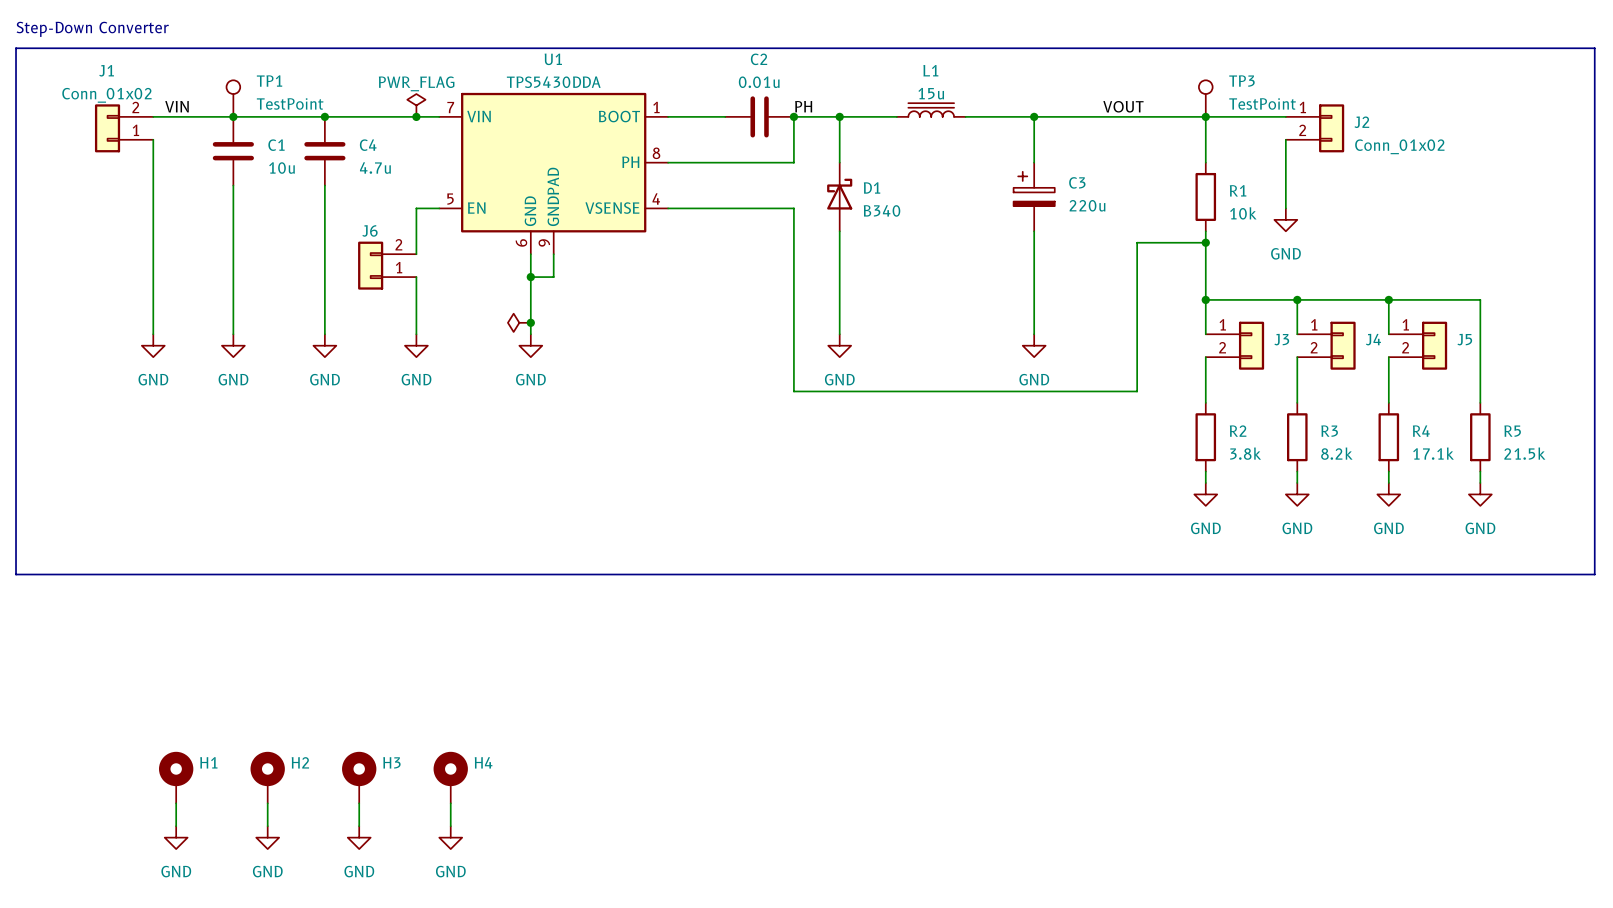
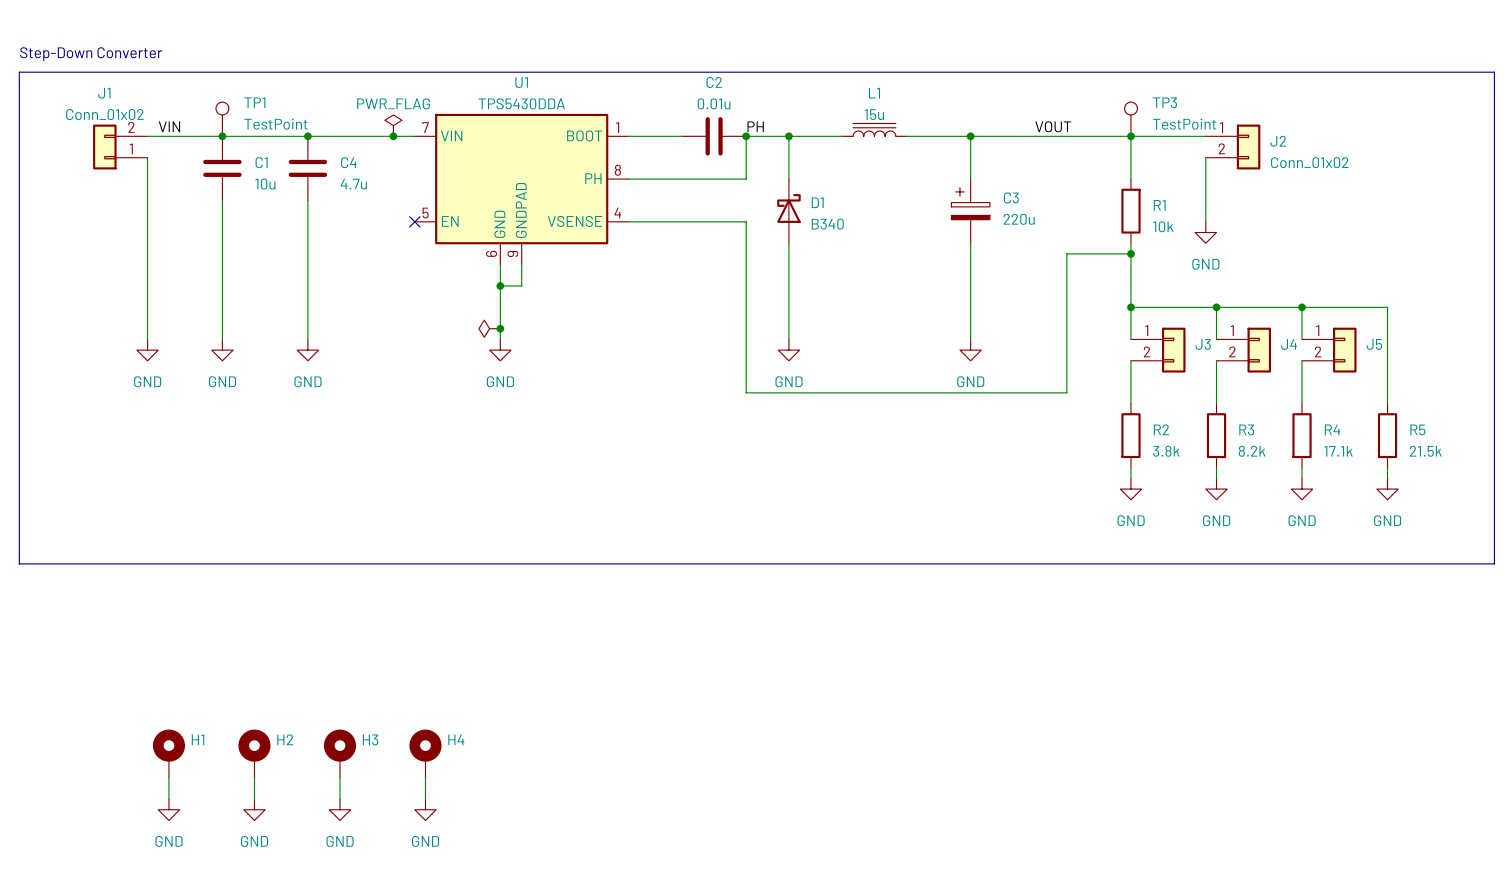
wire: (439, 208) (416, 208) (416, 254) -> none
no-connect mark: none -> (414, 221)
J6: (387, 265) -> none
wire: (416, 277) (416, 334) -> none
power symbol: GND (416, 345) -> none

